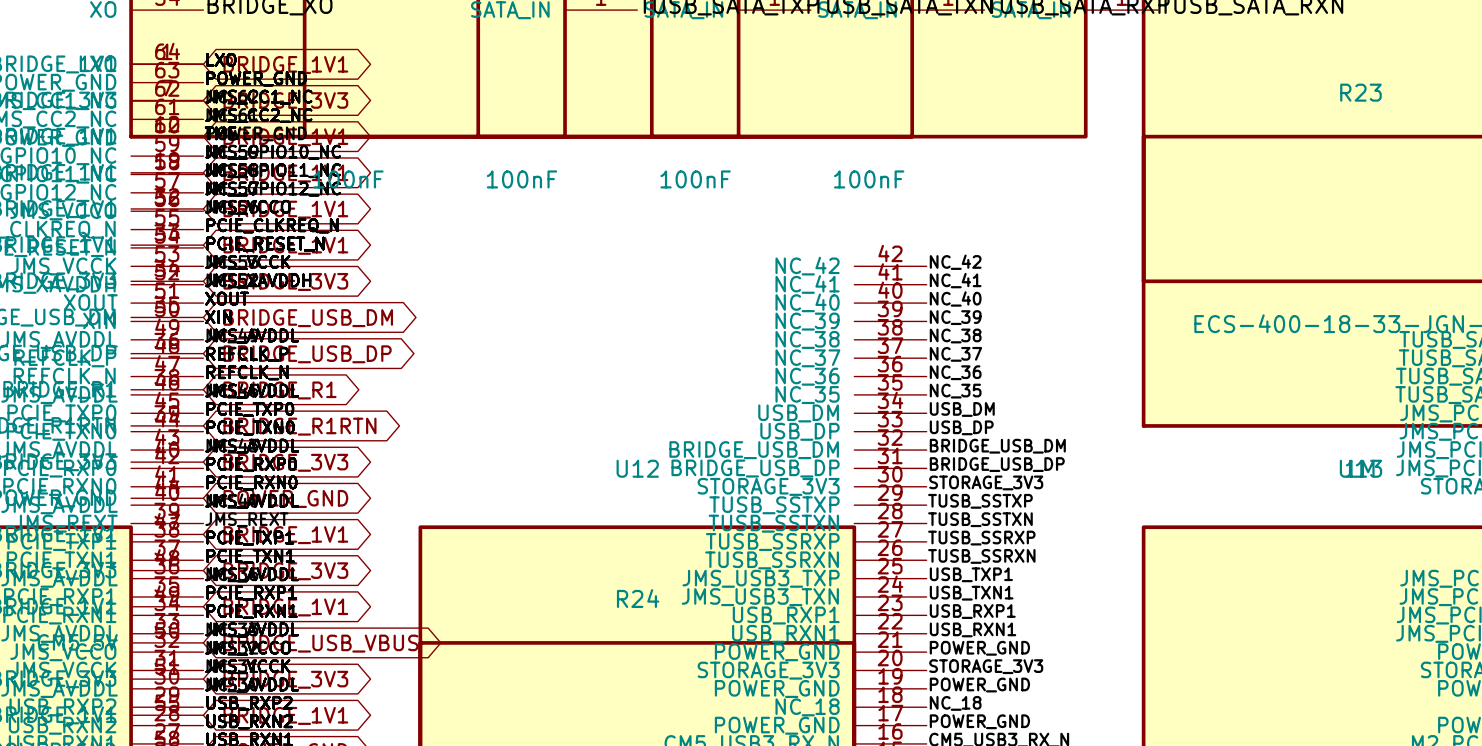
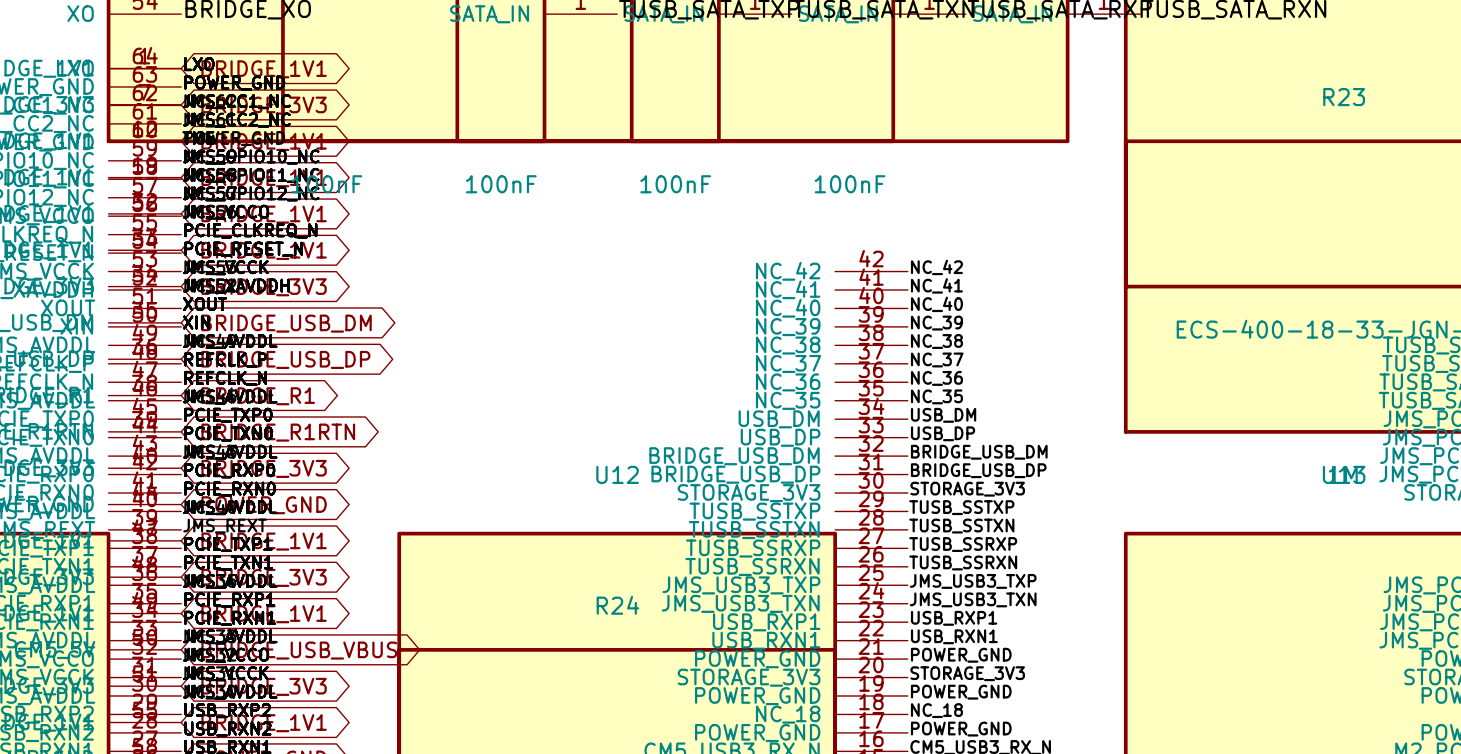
label: USB_TXP1 (971, 574) -> JMS_USB3_TXP (973, 581)
label: USB_TXN1 (971, 593) -> JMS_USB3_TXN (973, 599)

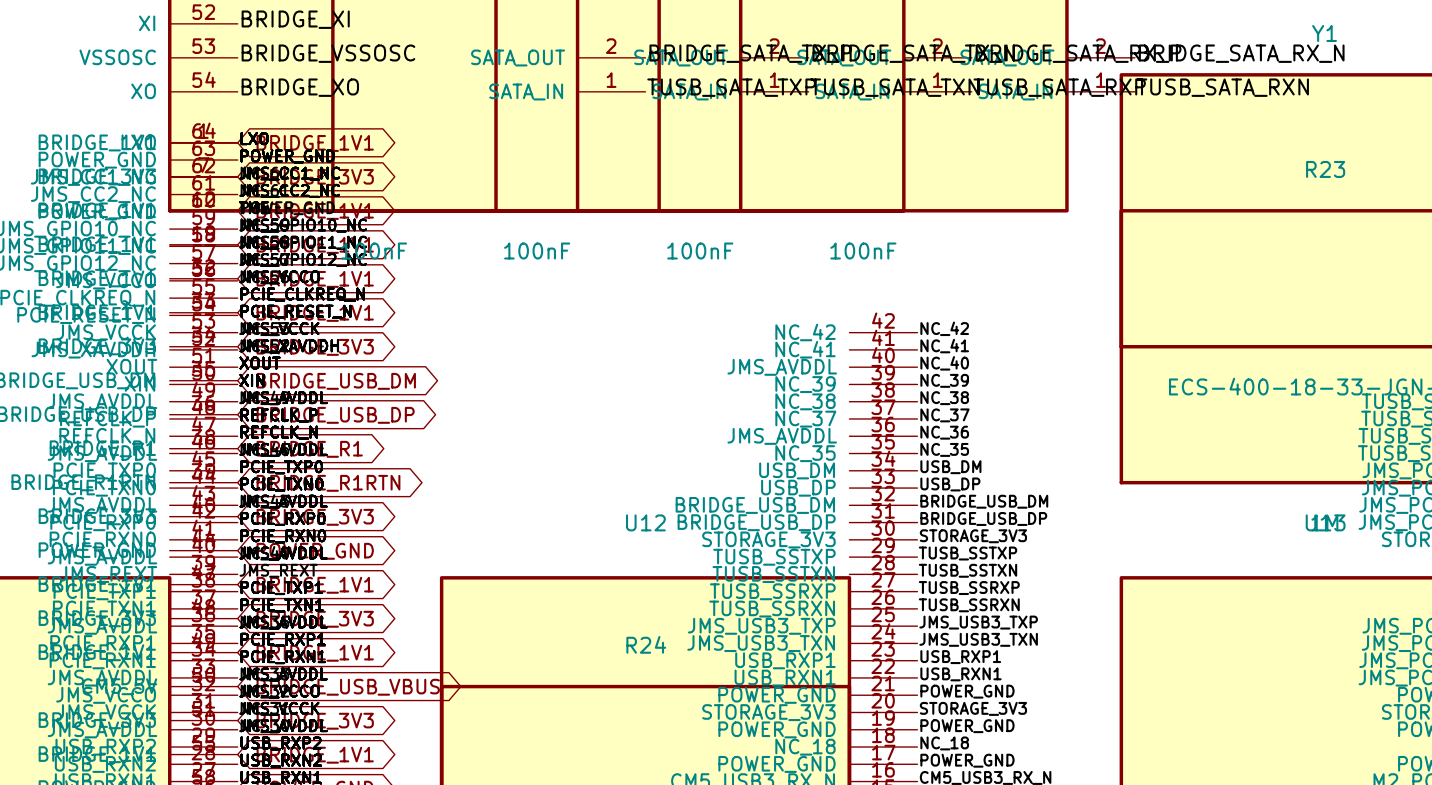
U12 pin name: NC_40 (788, 308) -> JMS_AVDDL (782, 367)
U12 pin name: NC_36 (788, 382) -> JMS_AVDDL (782, 436)

